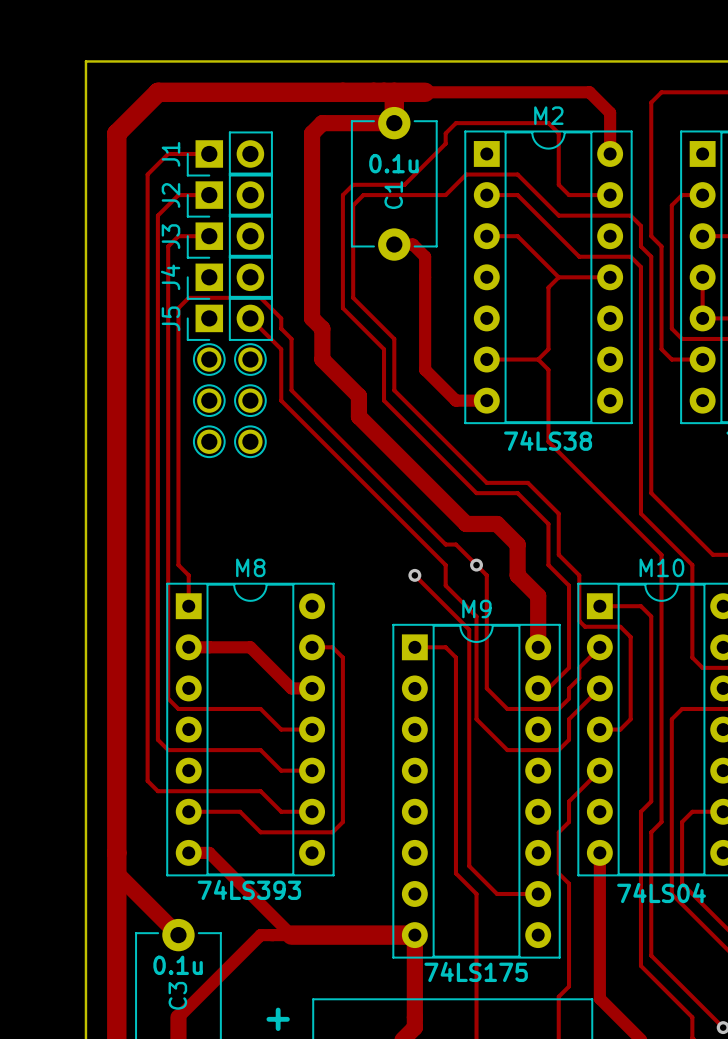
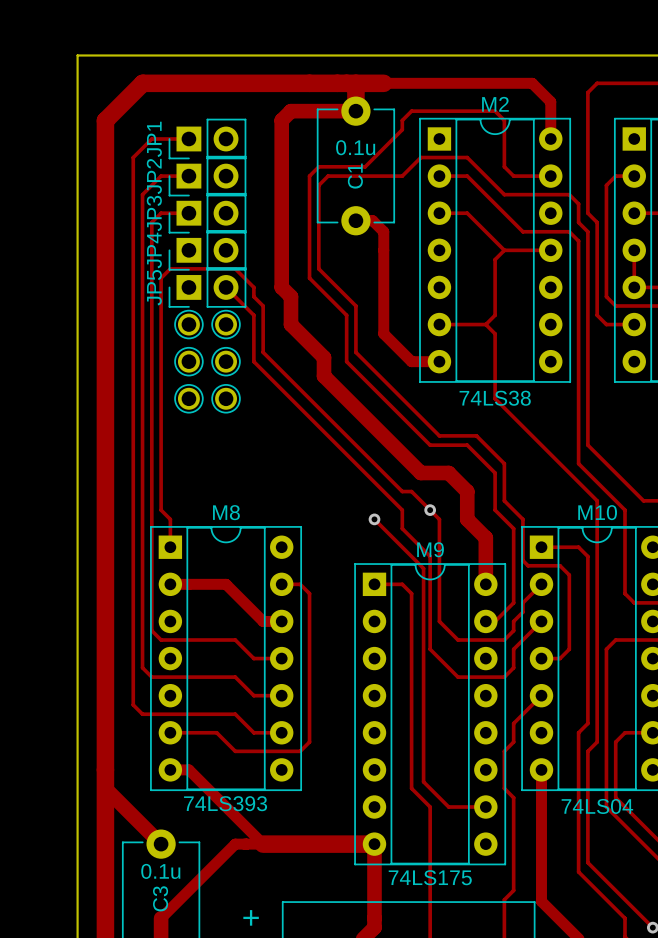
J1 name: J1 (170, 154) -> JP1 (154, 139)
J2 name: J2 (170, 195) -> JP2 (154, 176)
J3 name: J3 (170, 236) -> JP3 (154, 213)
J4 name: J4 (170, 277) -> JP4 (154, 250)
J5 name: J5 (170, 318) -> JP5 (154, 287)

